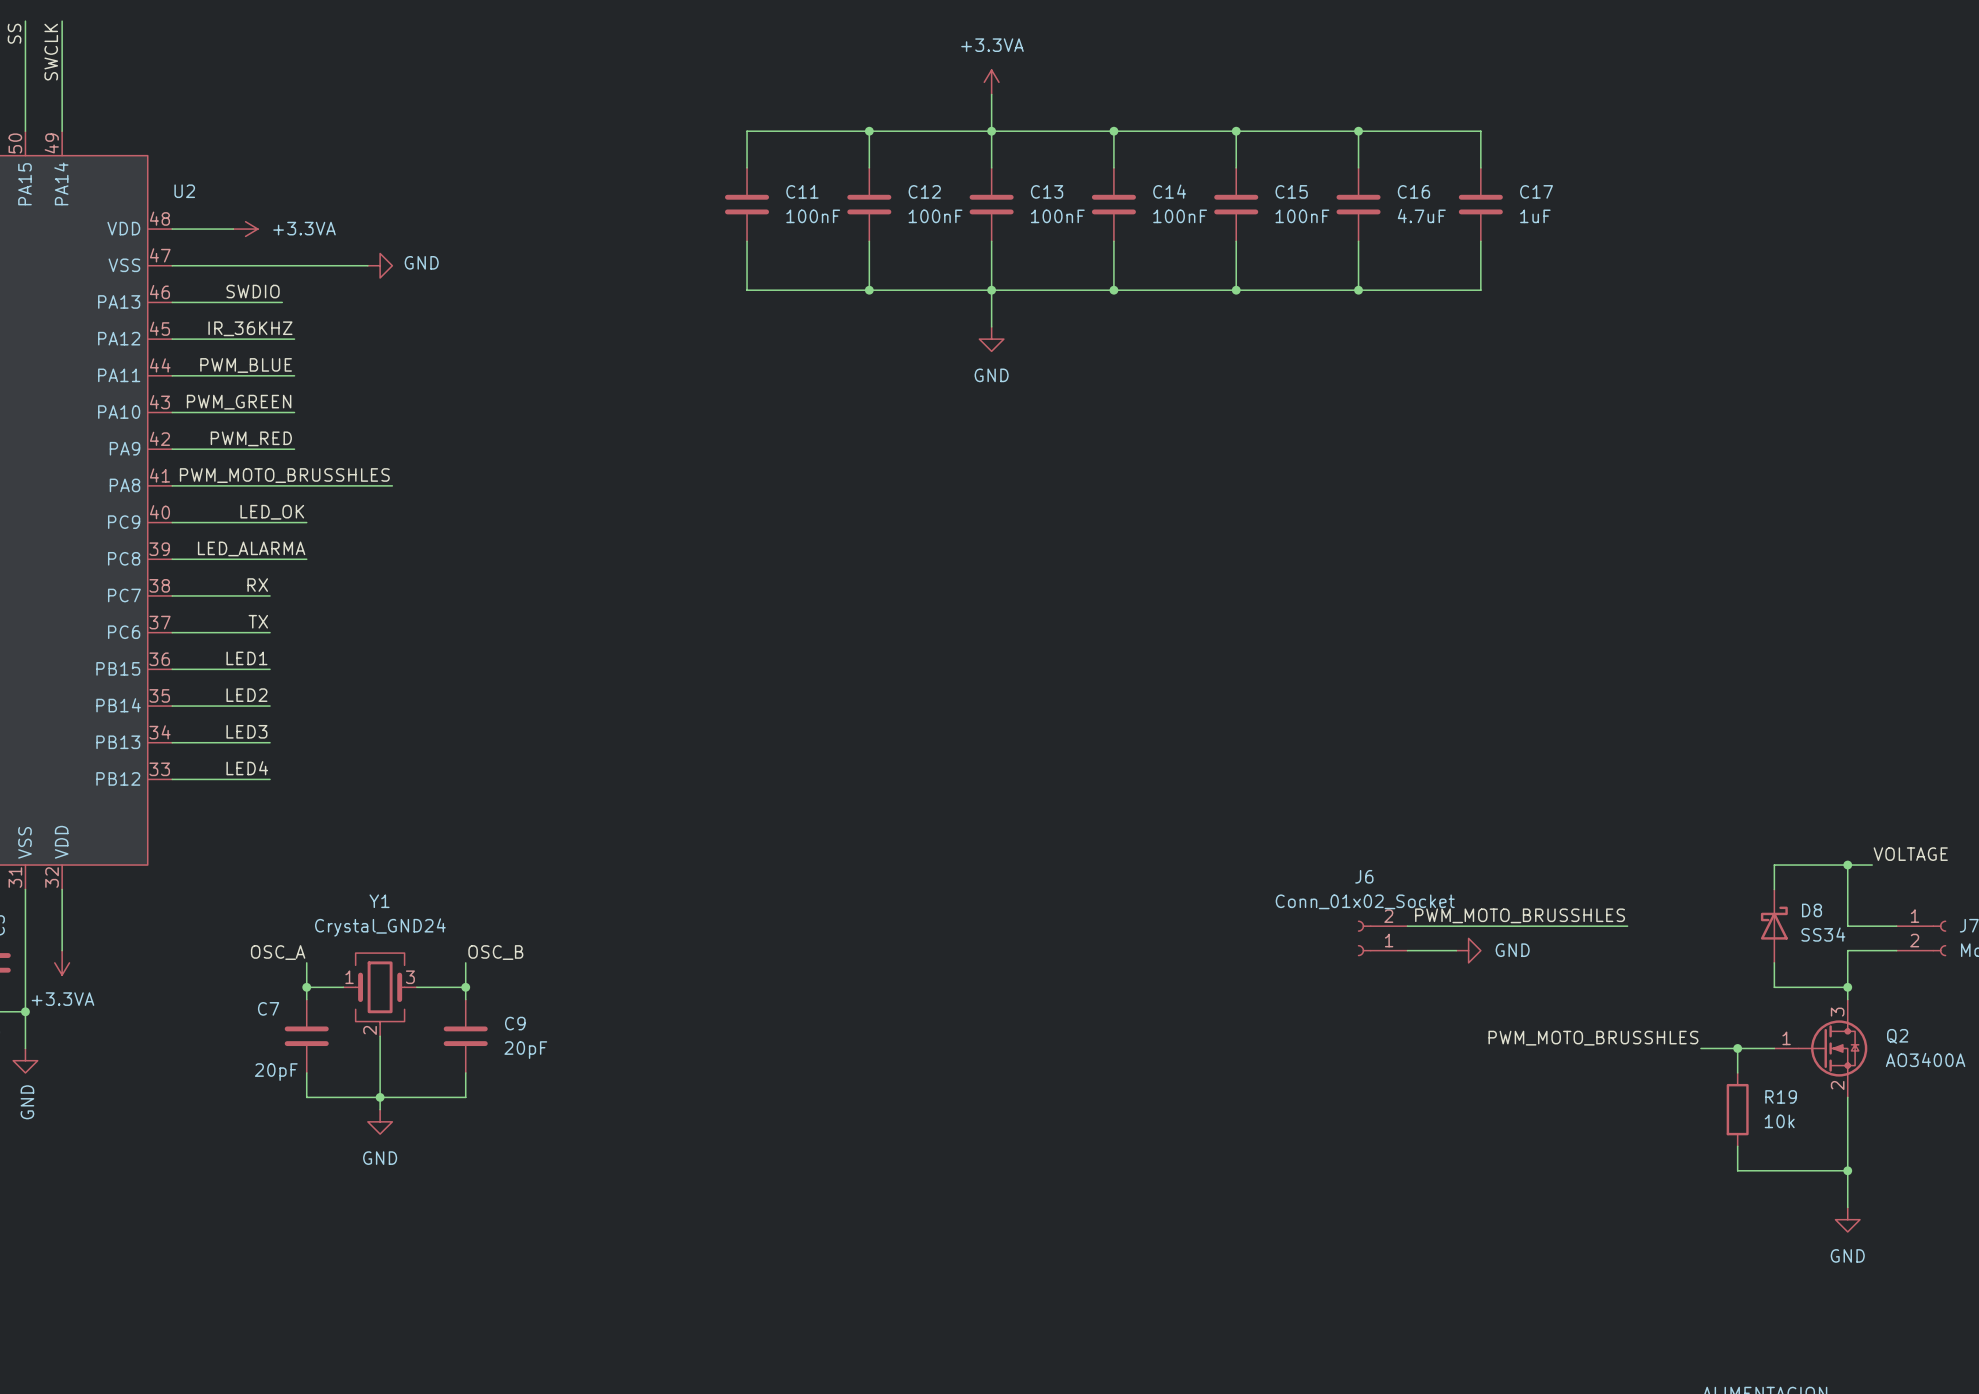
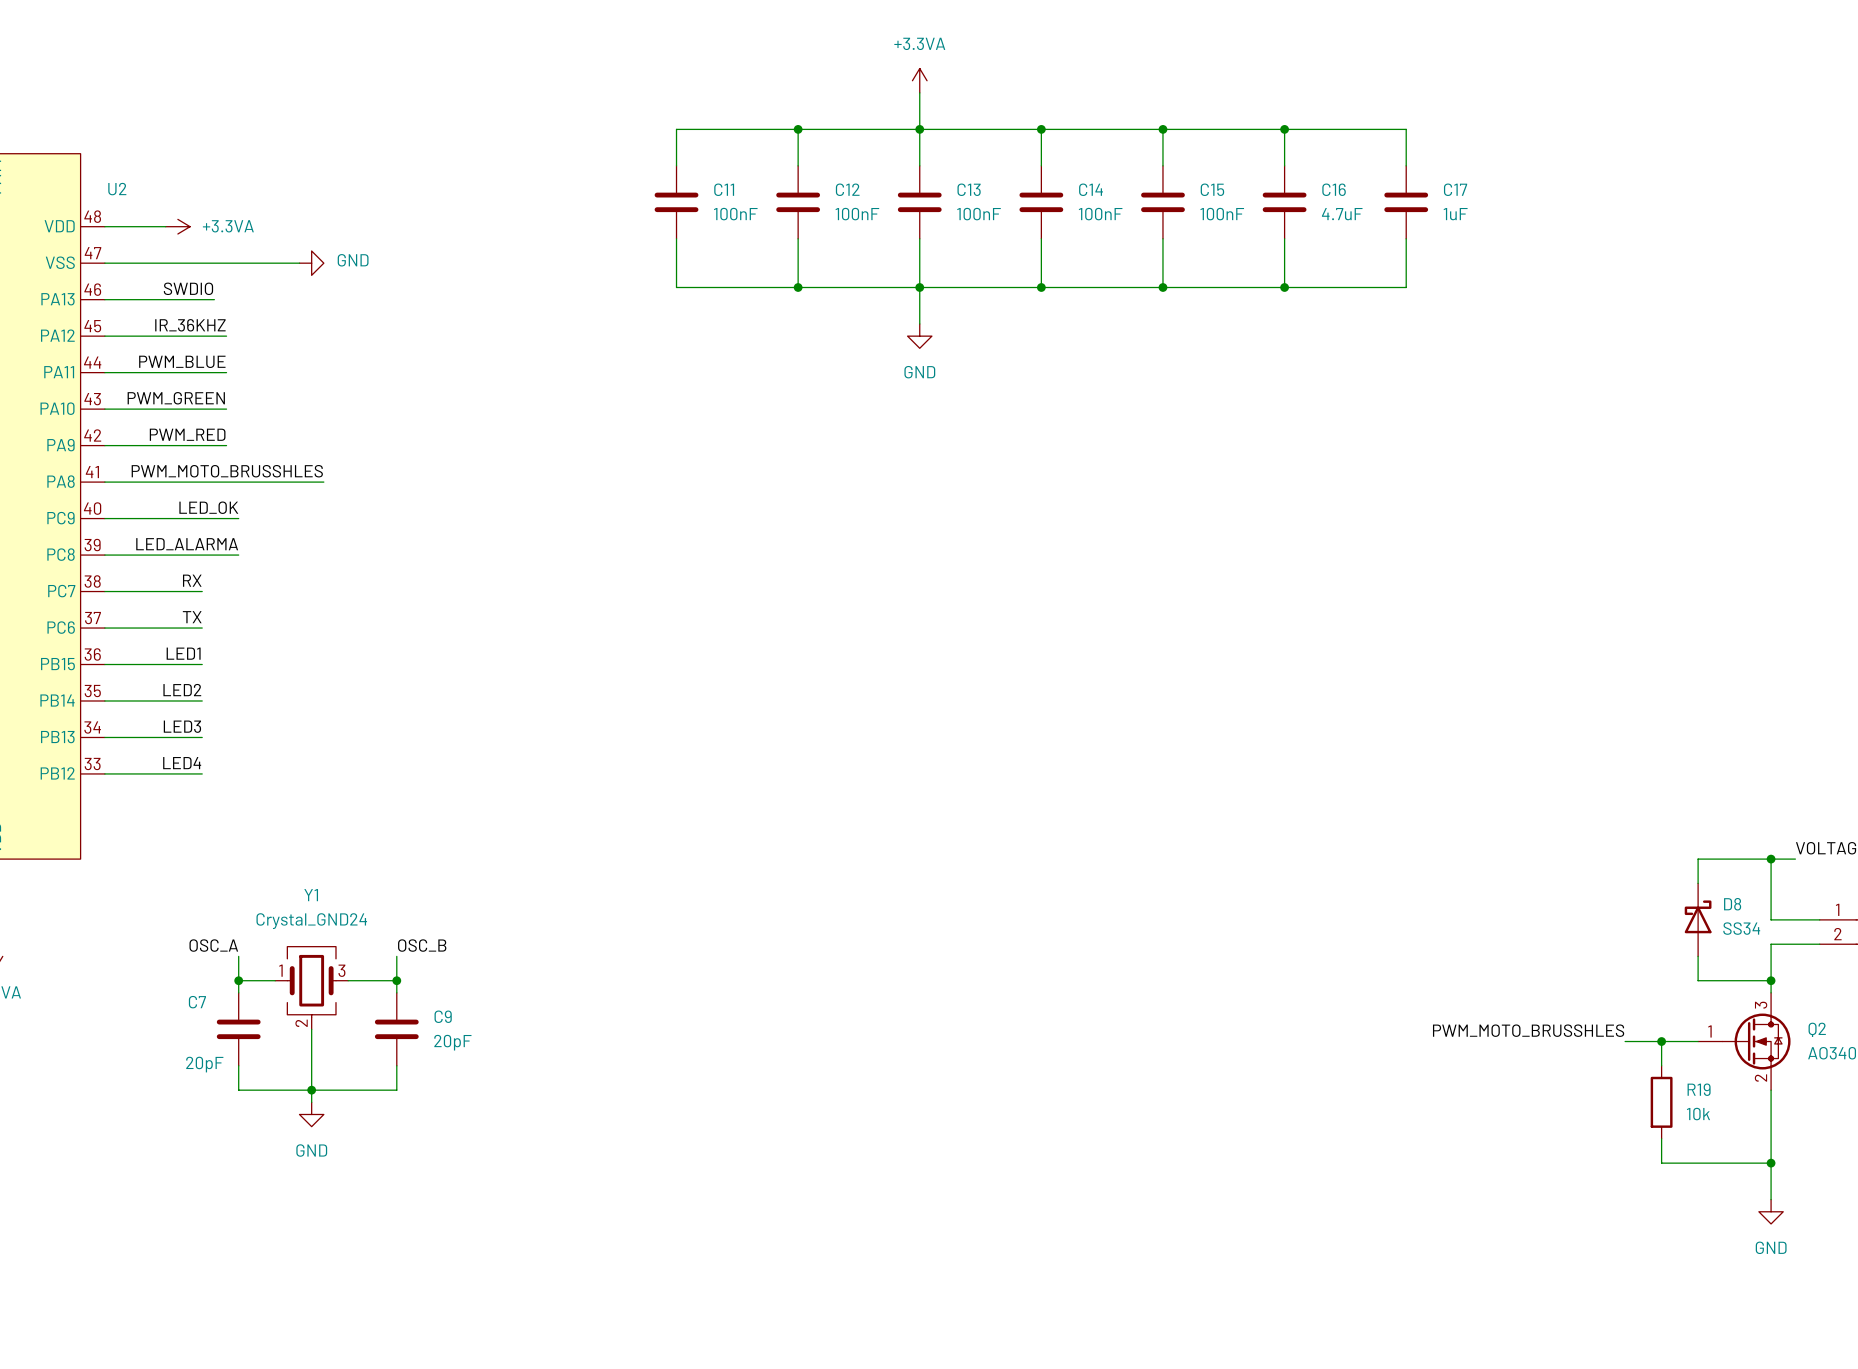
label: PWM_MOTO_BRUSSHLES (1520, 915) -> none
wire: (1407, 926) (1627, 926) -> none
J6: Conn_01x02_Socket (1382, 938) -> none
wire: (1407, 950) (1456, 950) -> none
power symbol: GND (1468, 950) -> none

